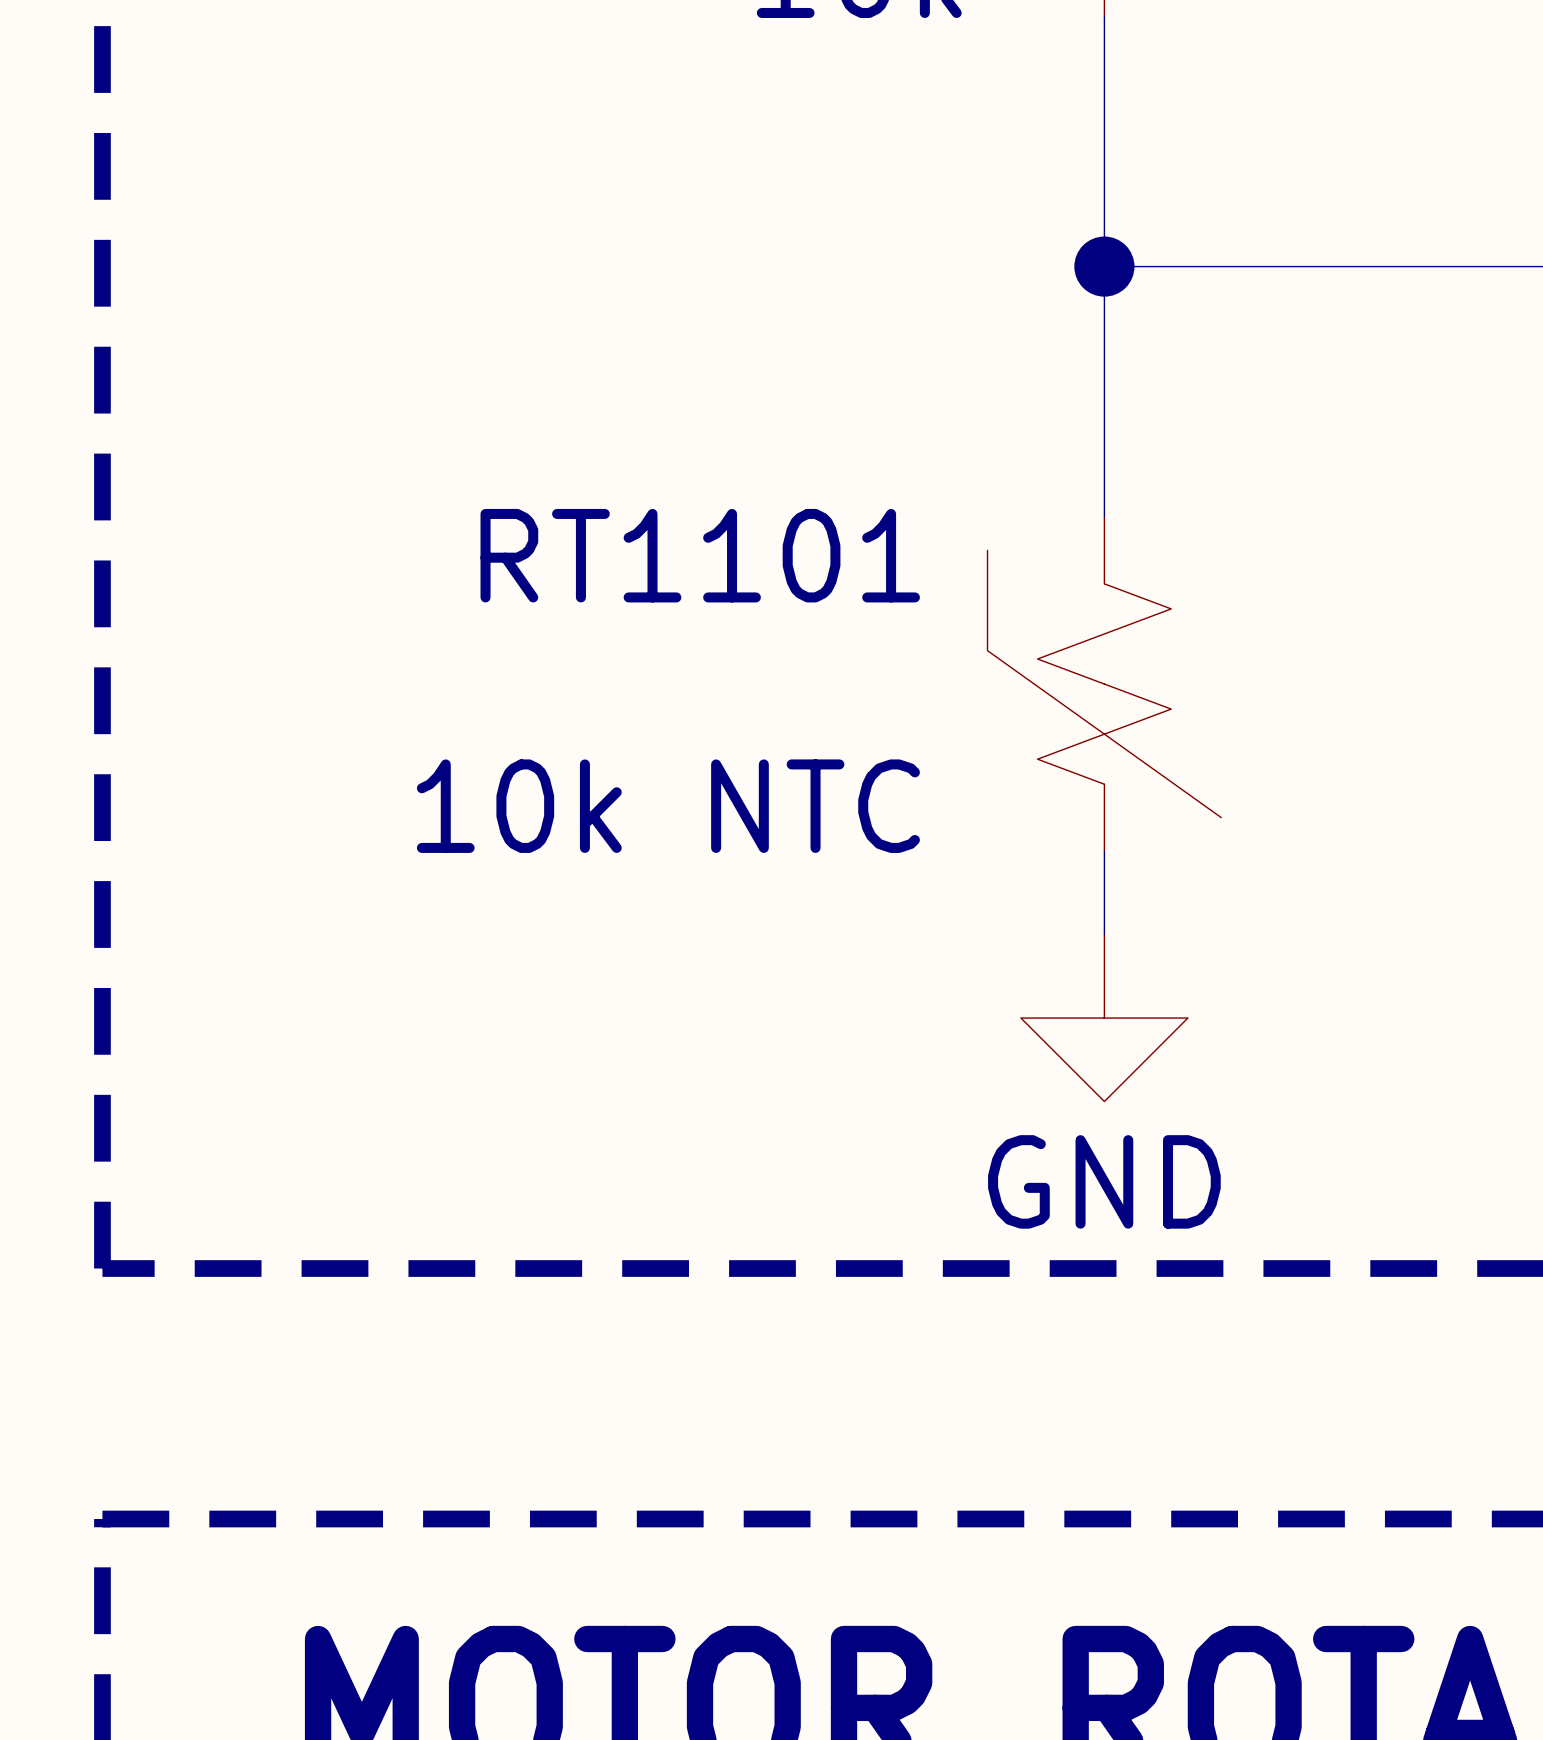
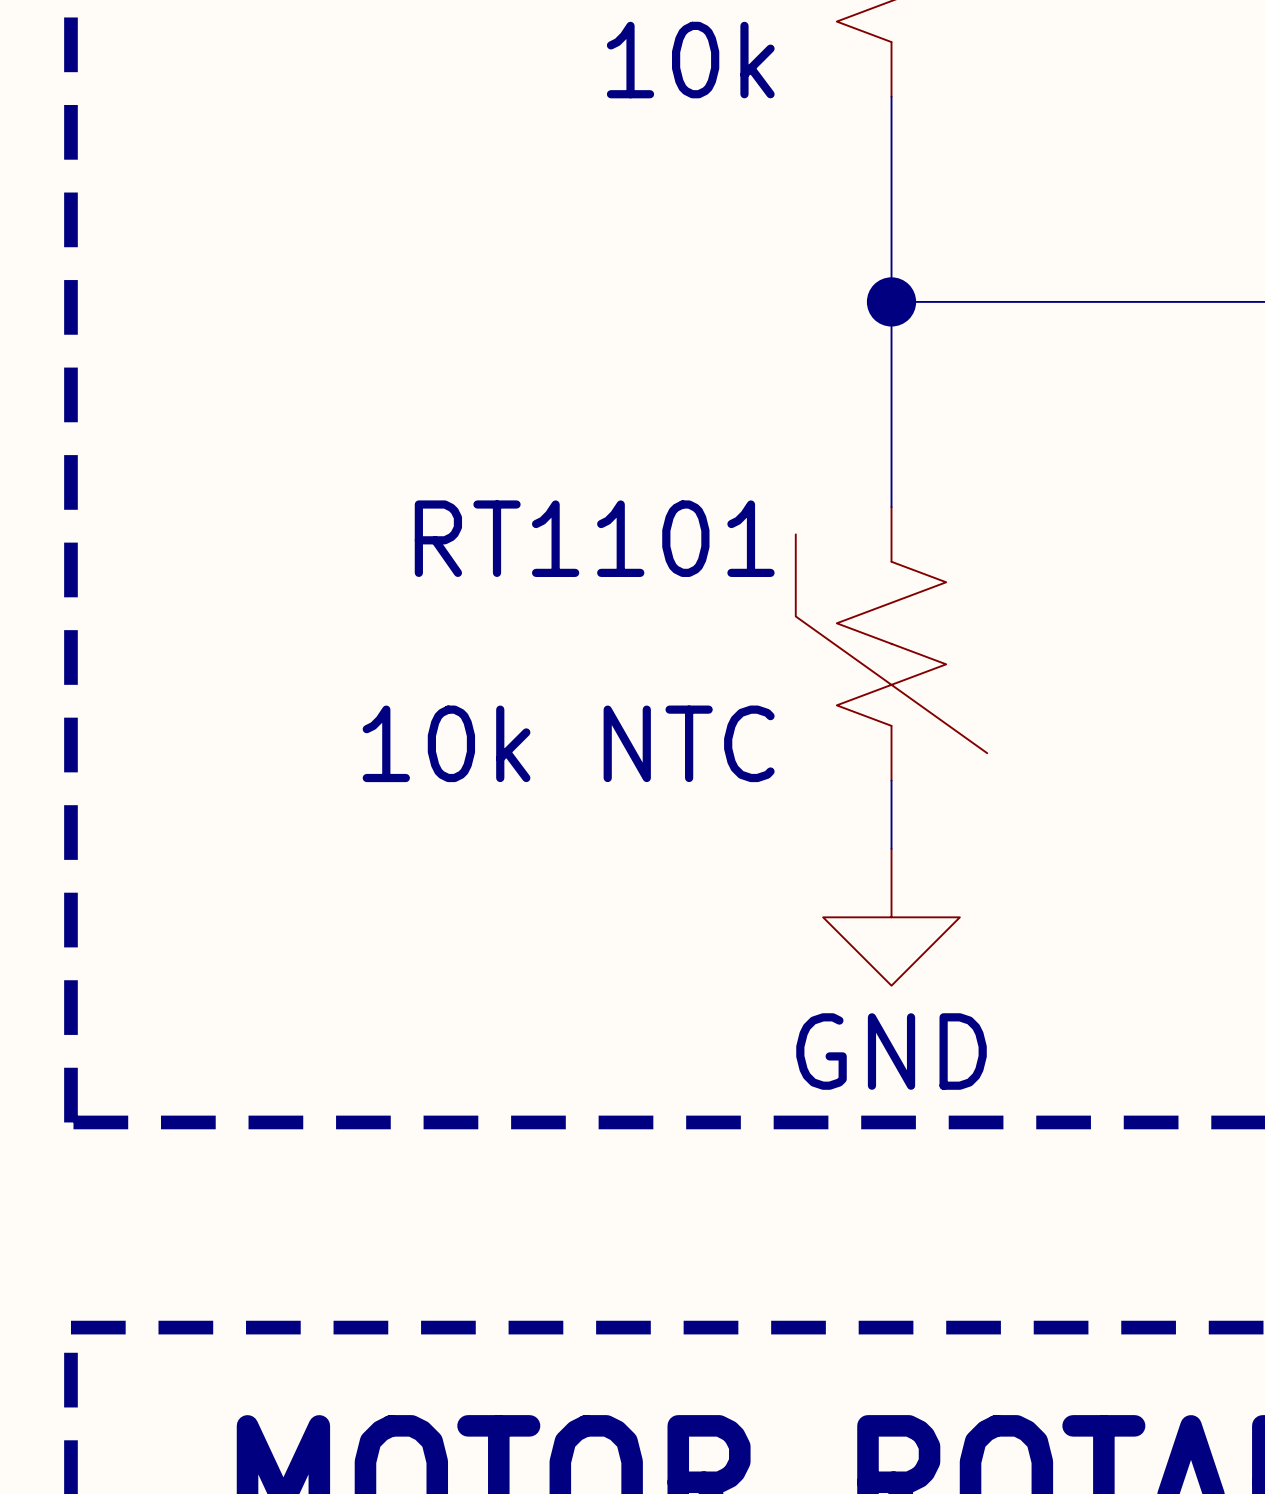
RT1101 name position: RT1101 (700, 555) -> RT1101 (594, 538)
RT1101 value position: 10k NTC (668, 806) -> 10k NTC (568, 743)

